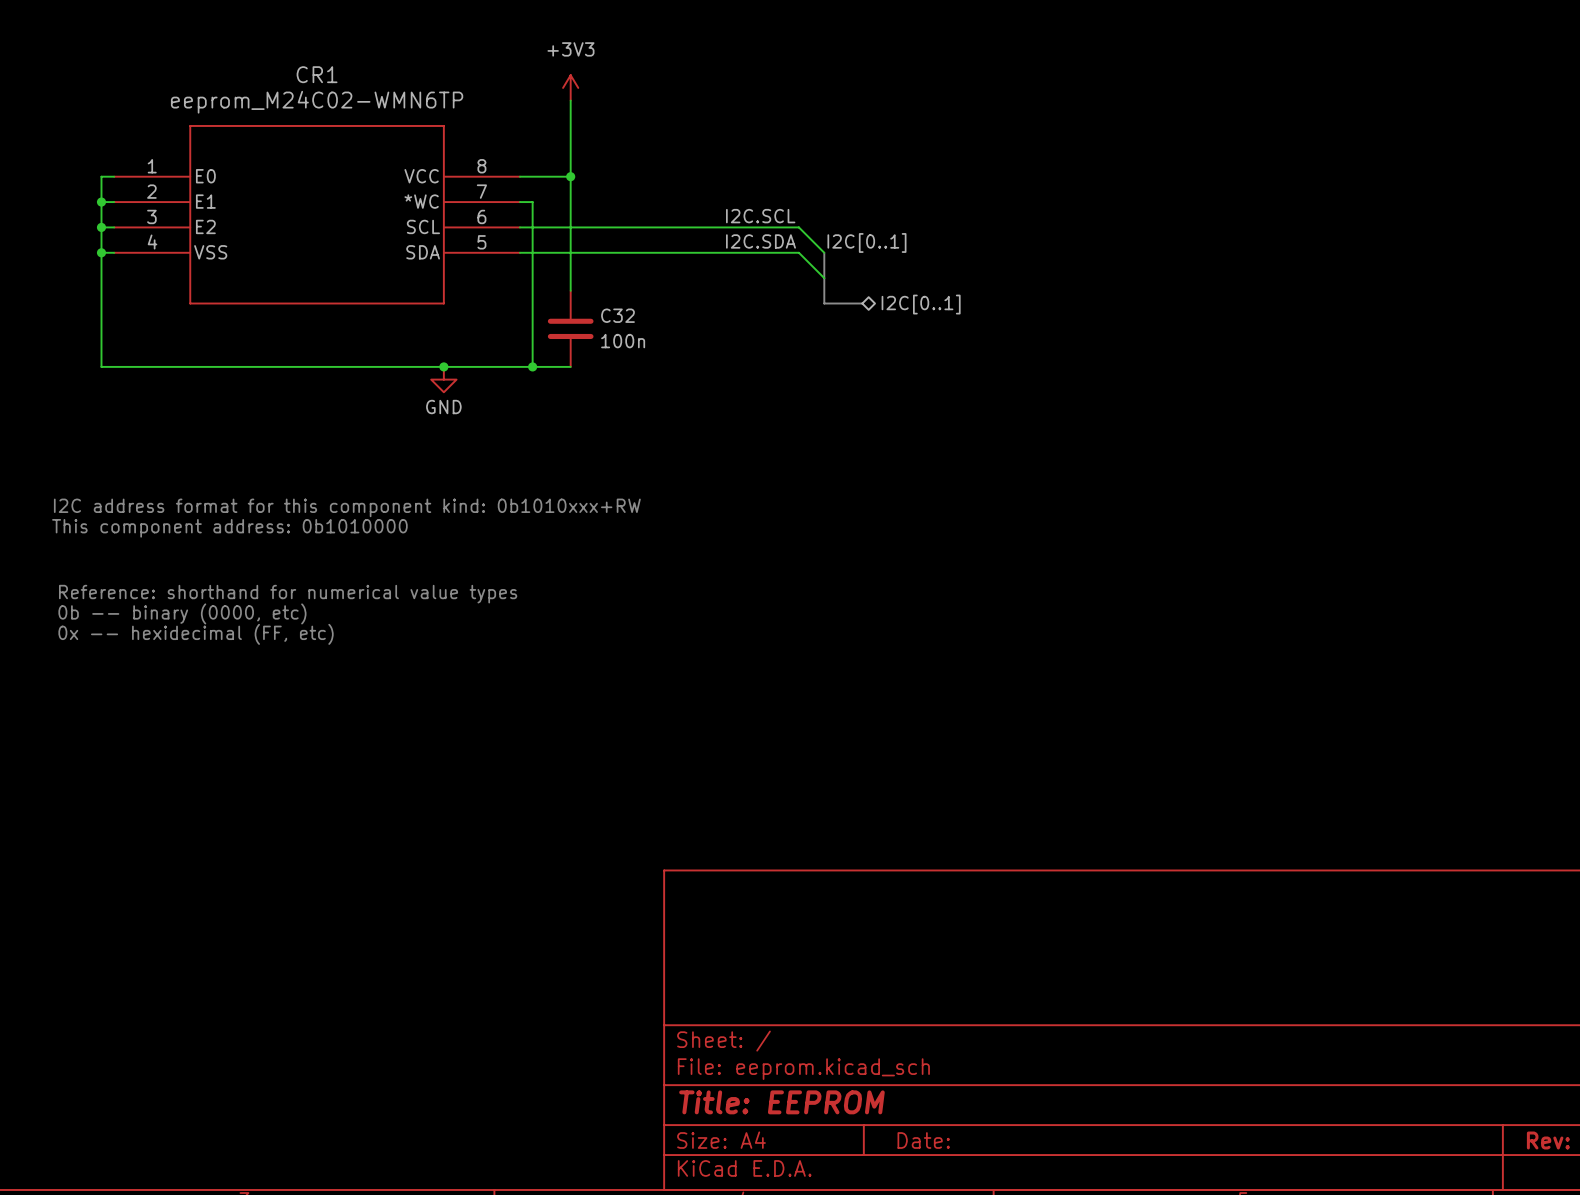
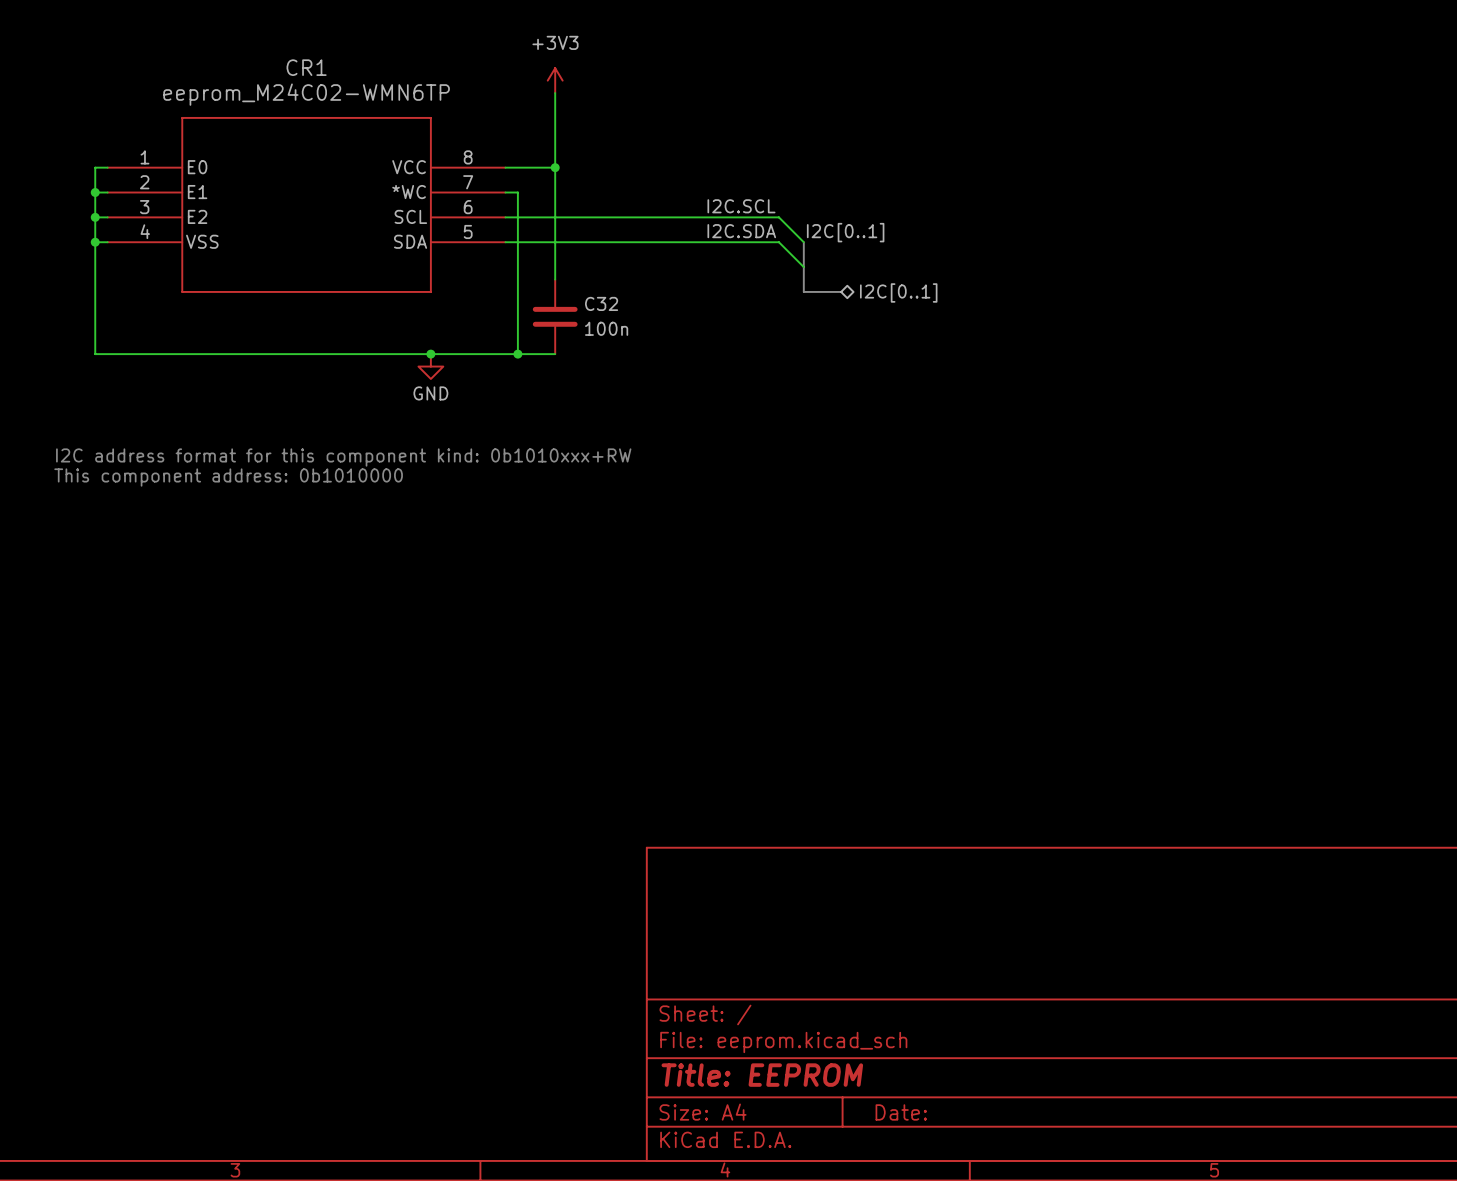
text position: I2C address format for this component kind: 0b1010xxx+RW (347, 507) -> I2C address format for this component kind: 0b1010xxx+RW (343, 457)
text position: This component address: 0b1010000 (229, 528) -> This component address: 0b1010000 (228, 477)
text: Reference: shorthand for numerical value types (288, 594) -> none
text: 0b -- binary (0000, etc) (182, 613) -> none
text: 0x -- hexidecimal (FF, etc) (196, 634) -> none

